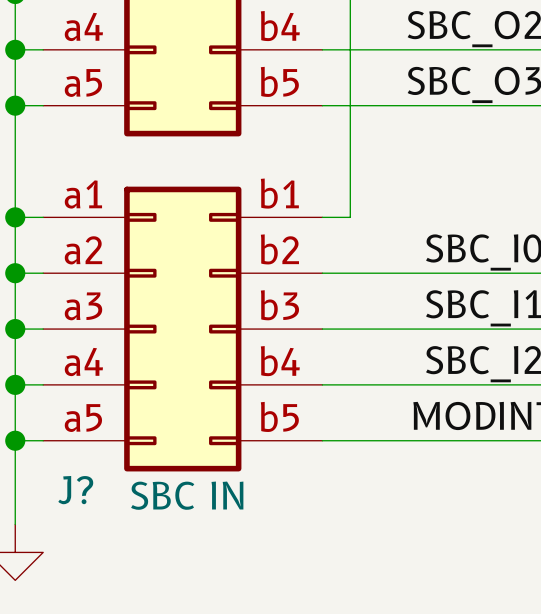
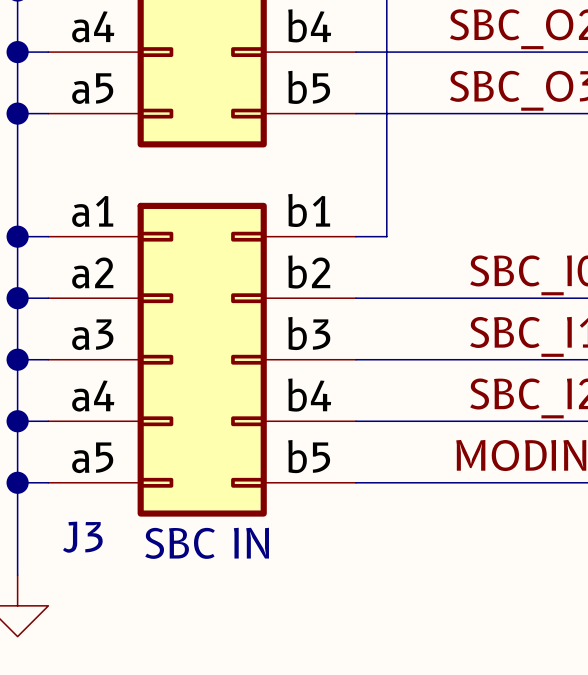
J? name: J? (75, 490) -> J3 (82, 537)

